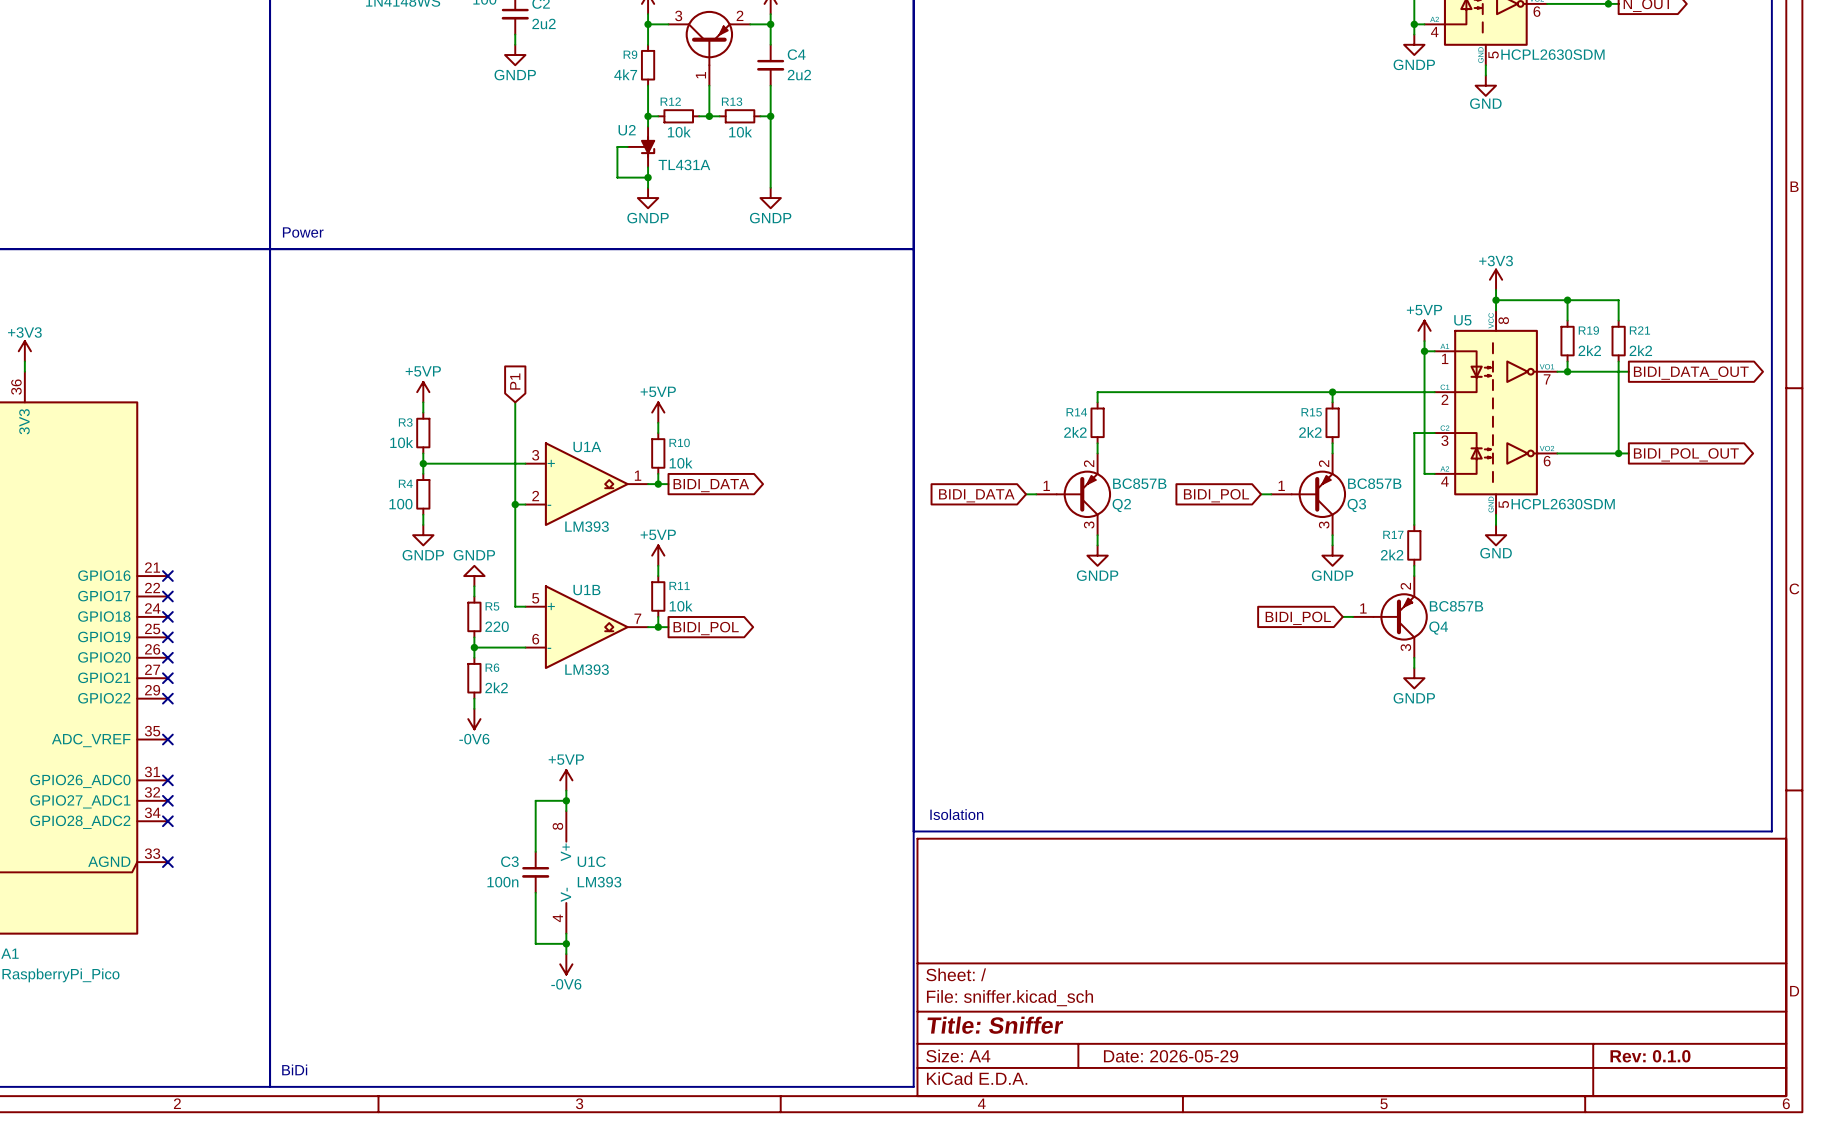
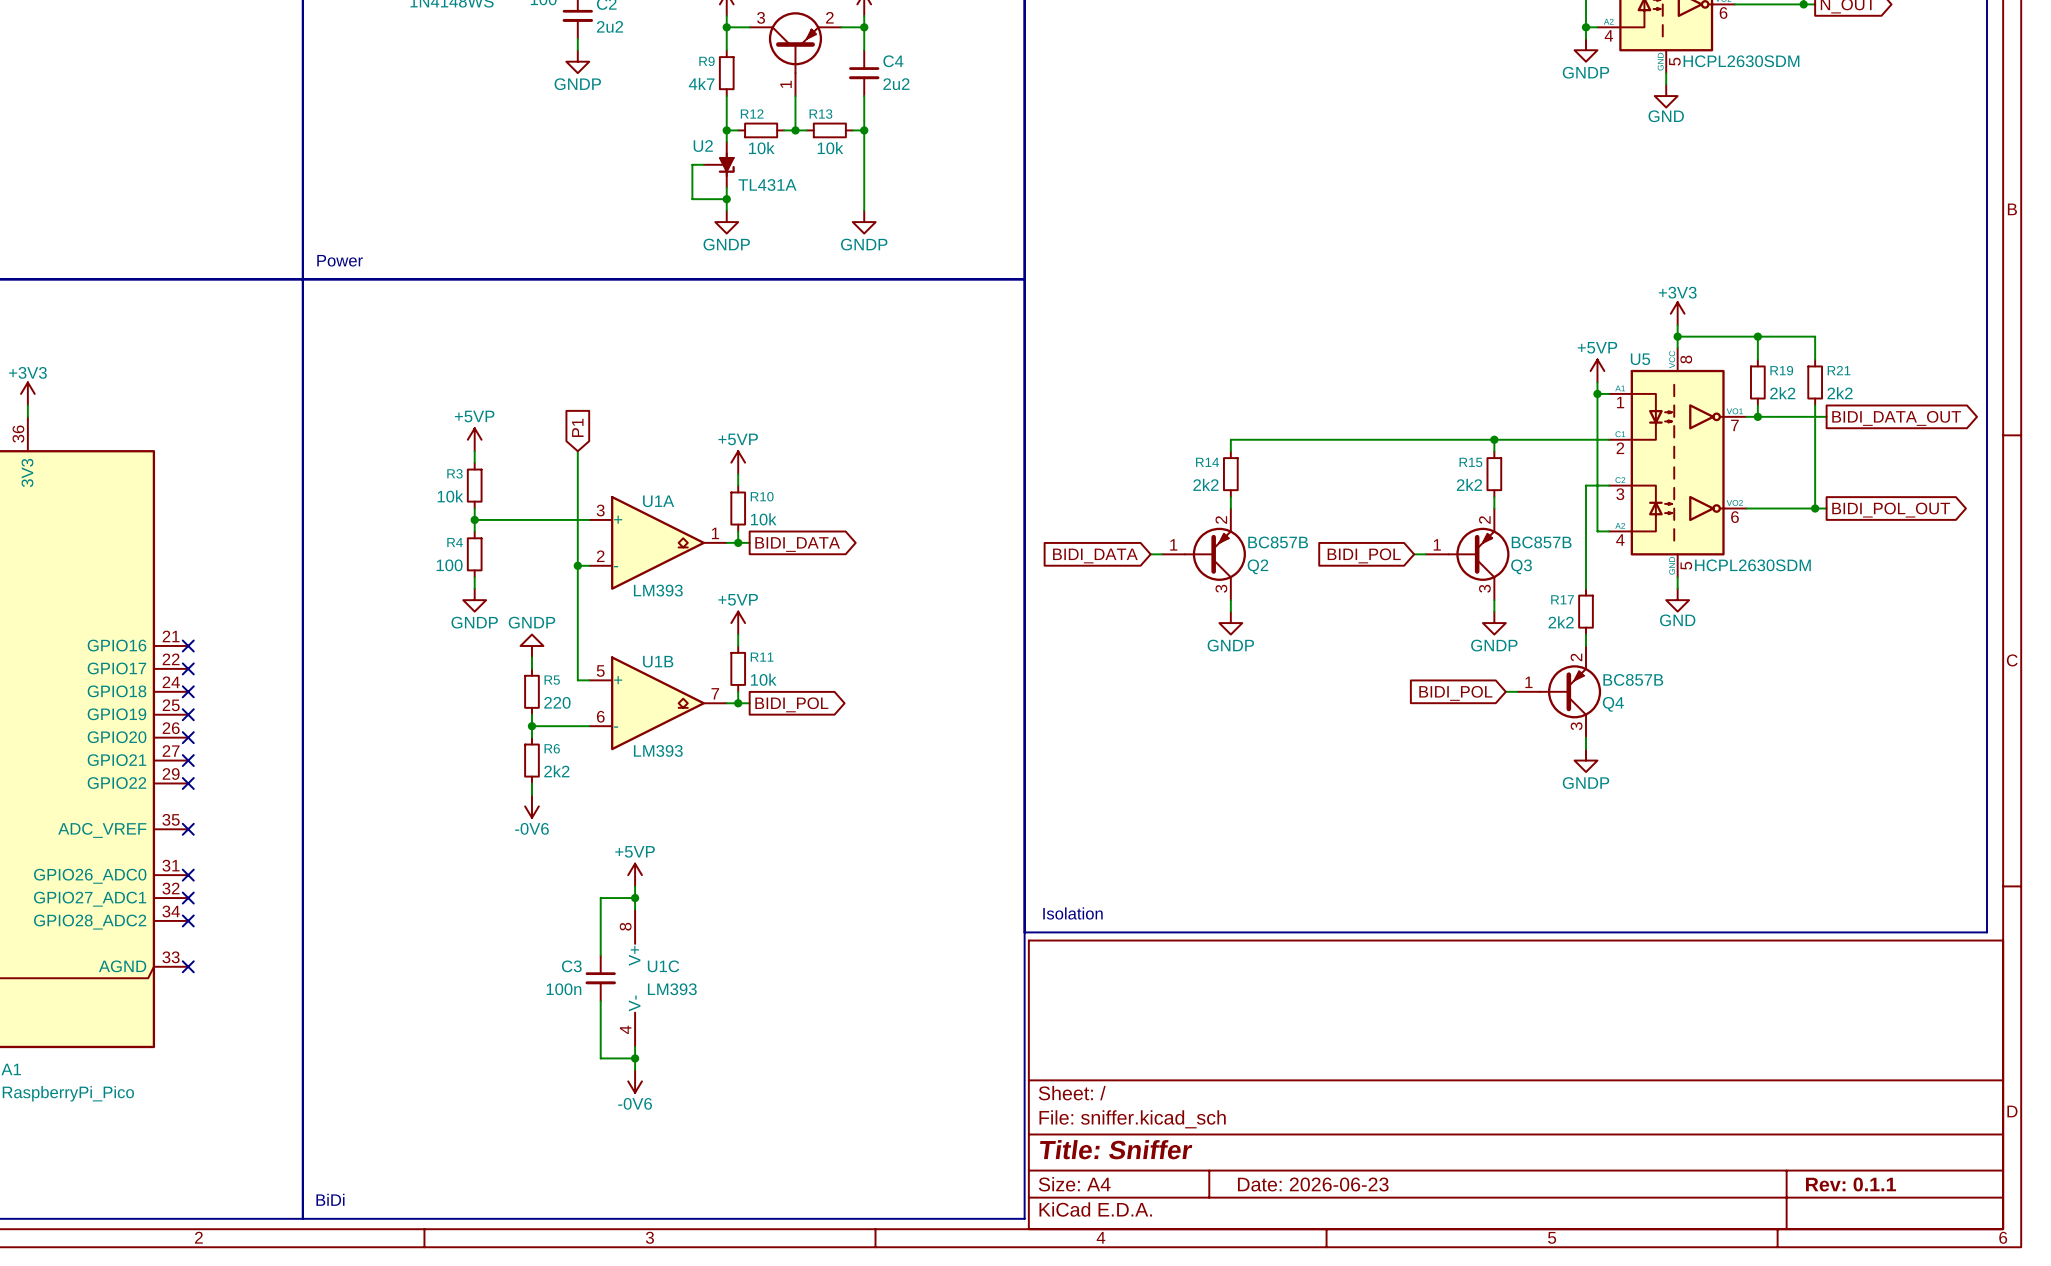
title block: Date: 2026-05-29 (1171, 1056) -> Date: 2026-06-23 (1313, 1184)
title block: Rev: 0.1.0 (1650, 1056) -> Rev: 0.1.1 (1850, 1184)

